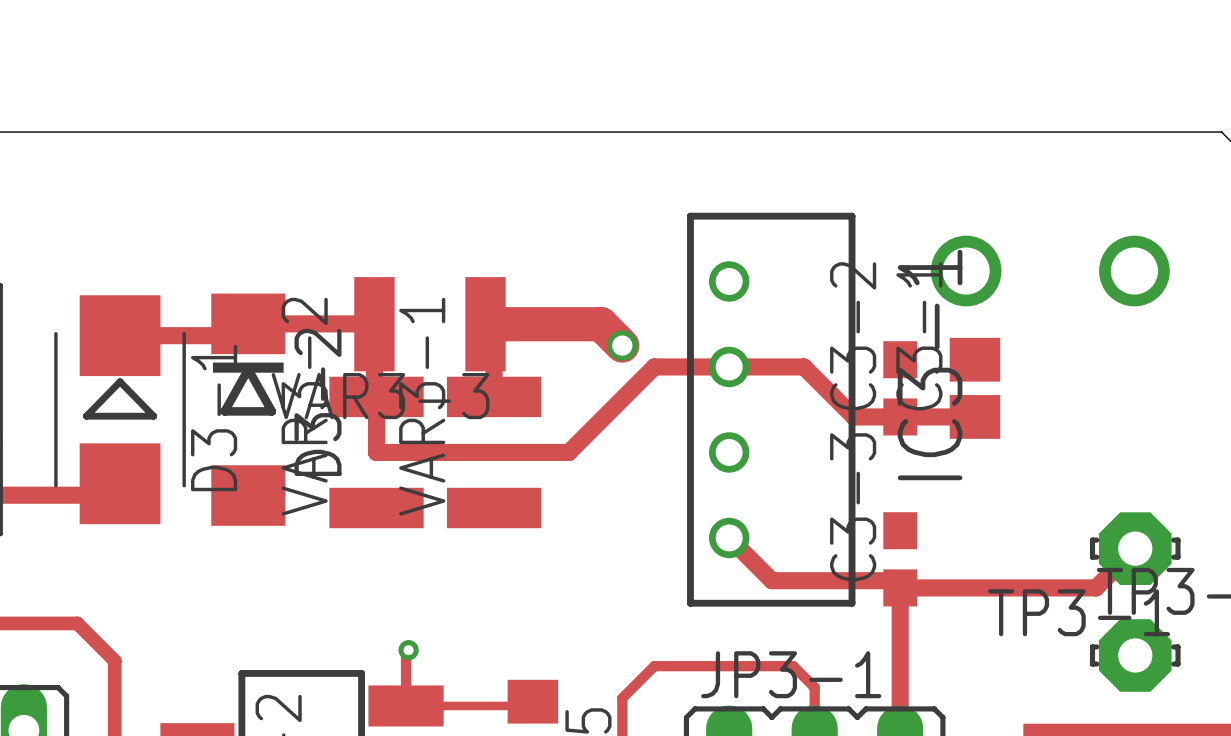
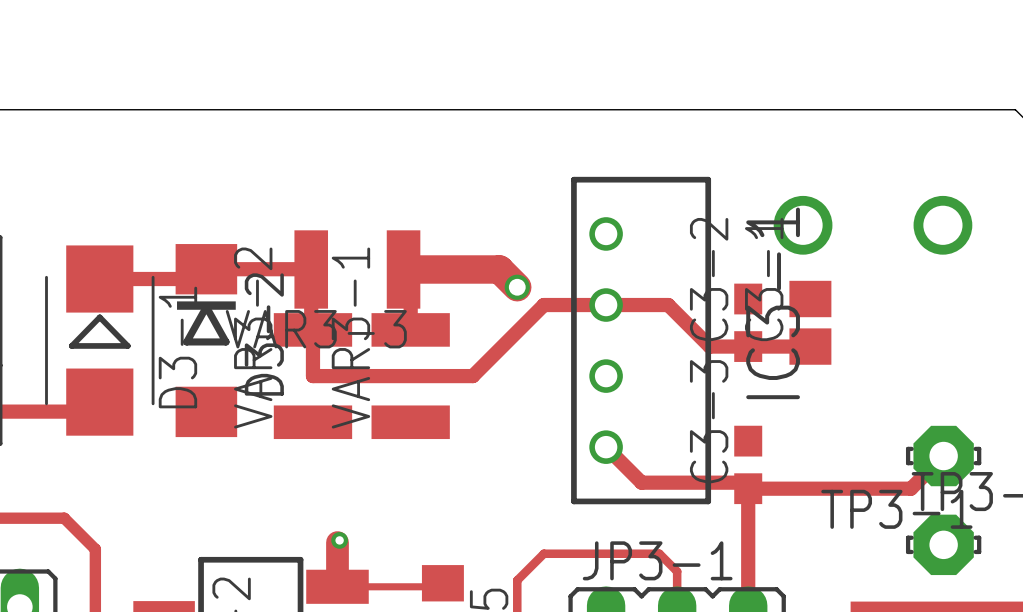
track width: thin (406, 652) (406, 705) -> thick (337, 542) (337, 586)

